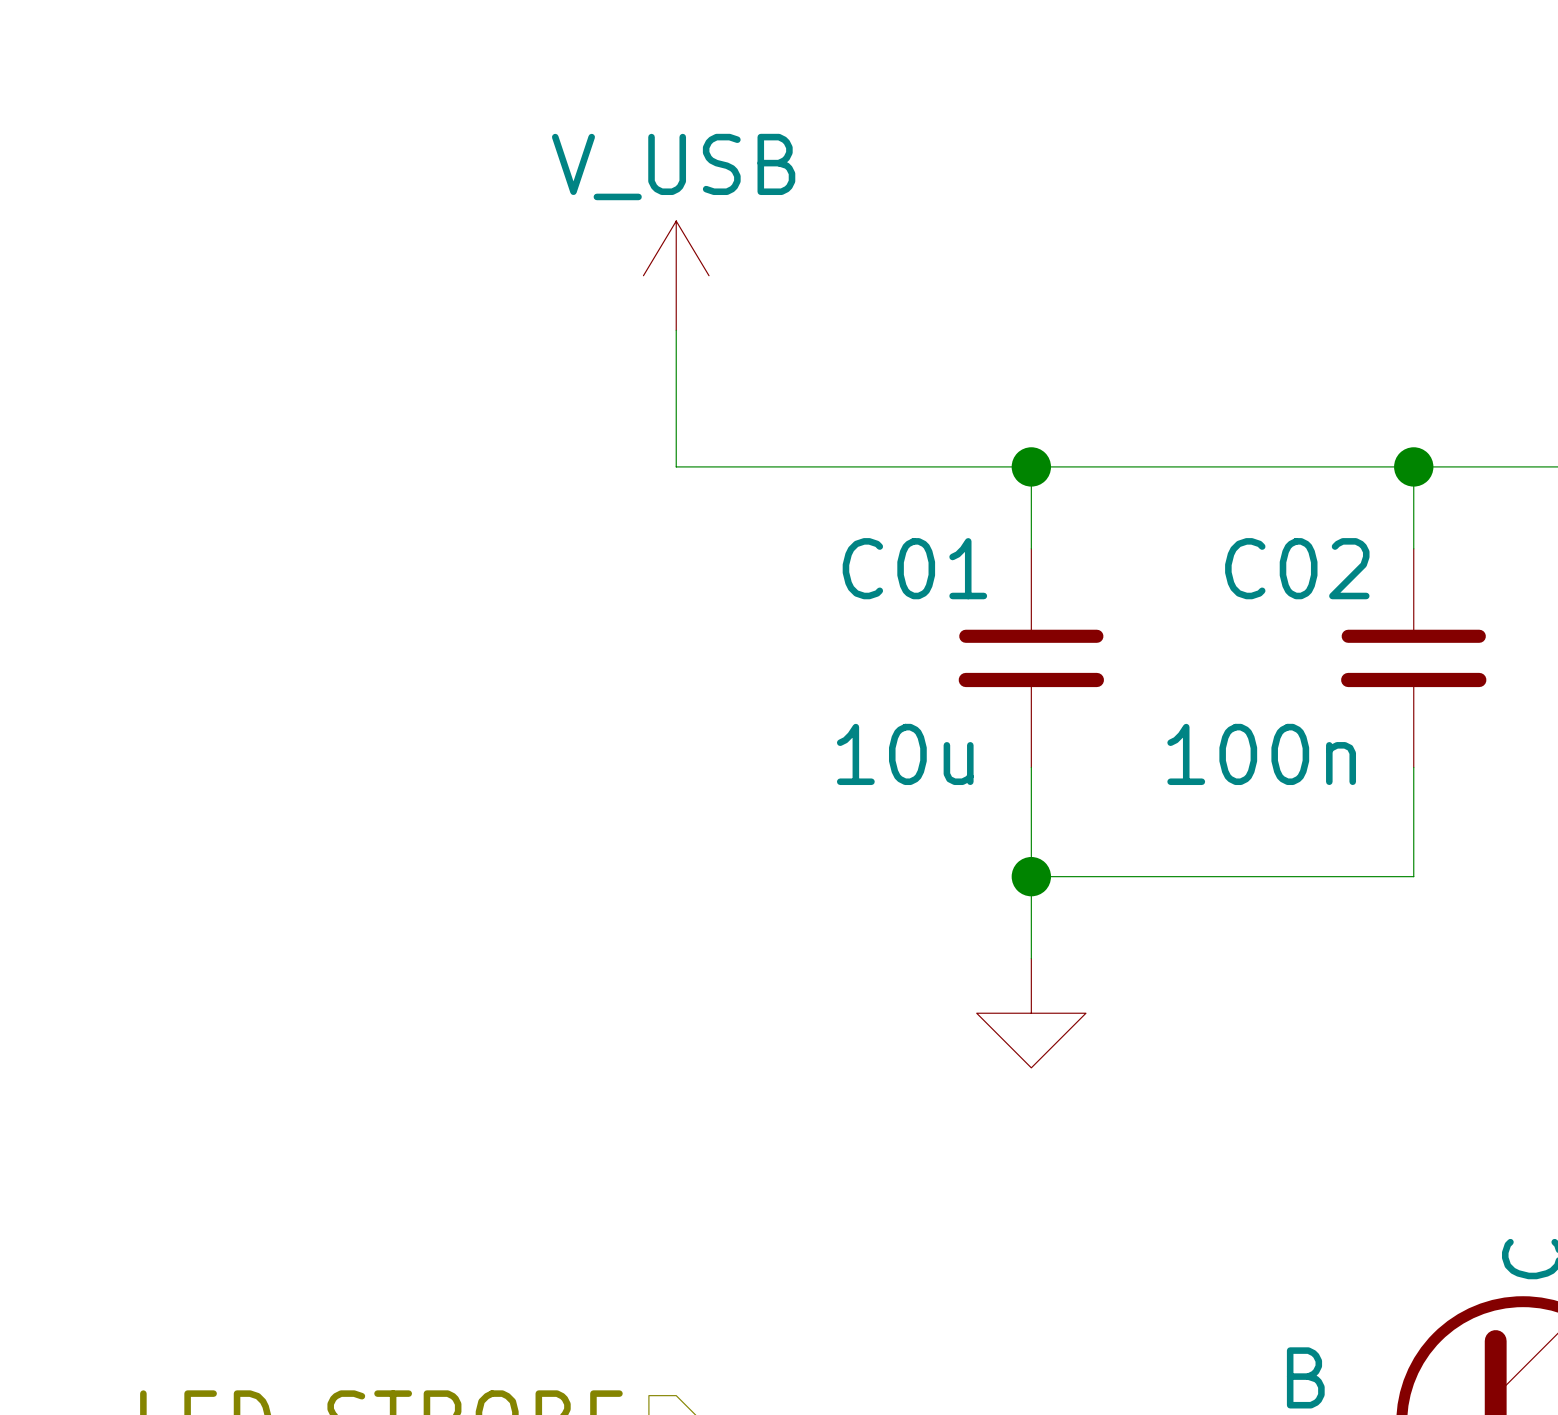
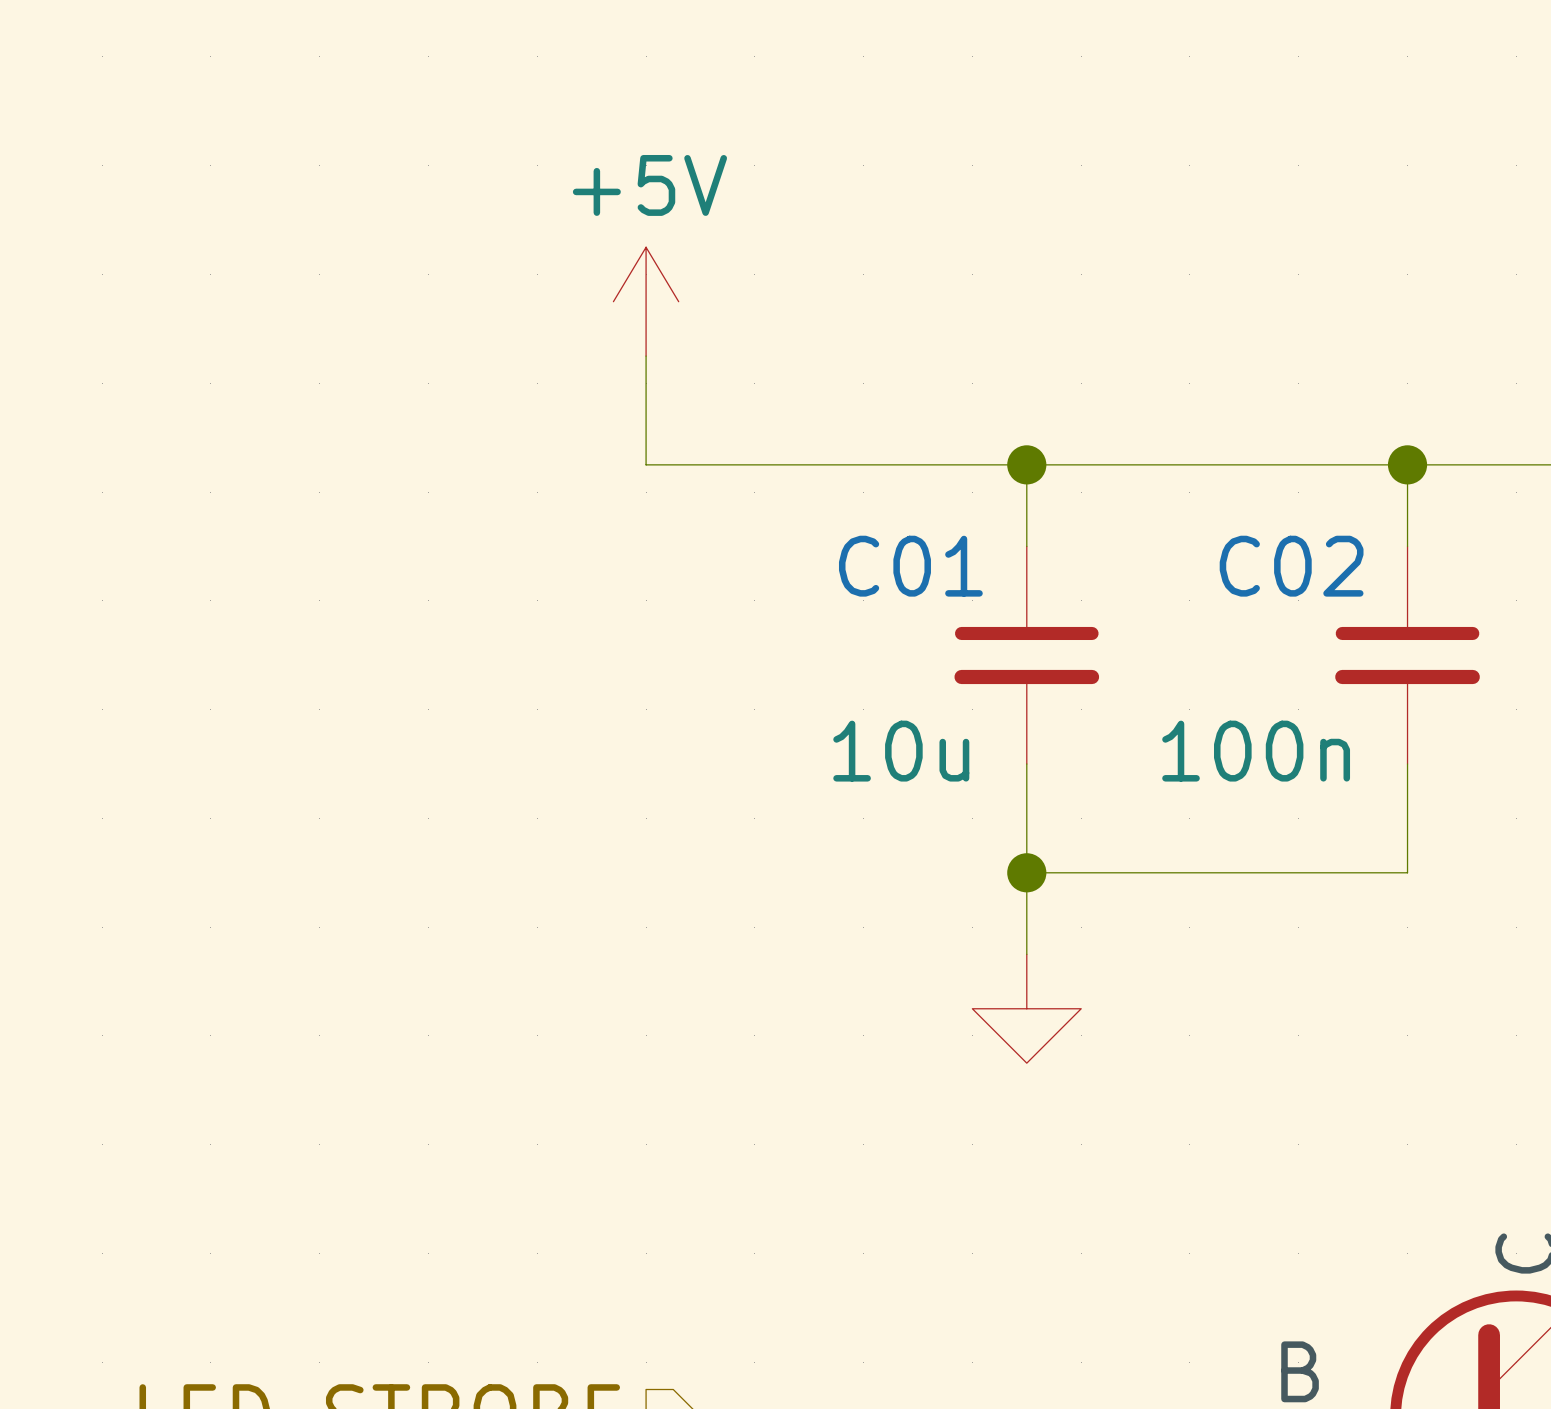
power symbol: V_USB (676, 275) -> +5V (646, 301)
wire: (676, 330) (676, 466) -> (646, 356) (646, 464) (673, 464)

